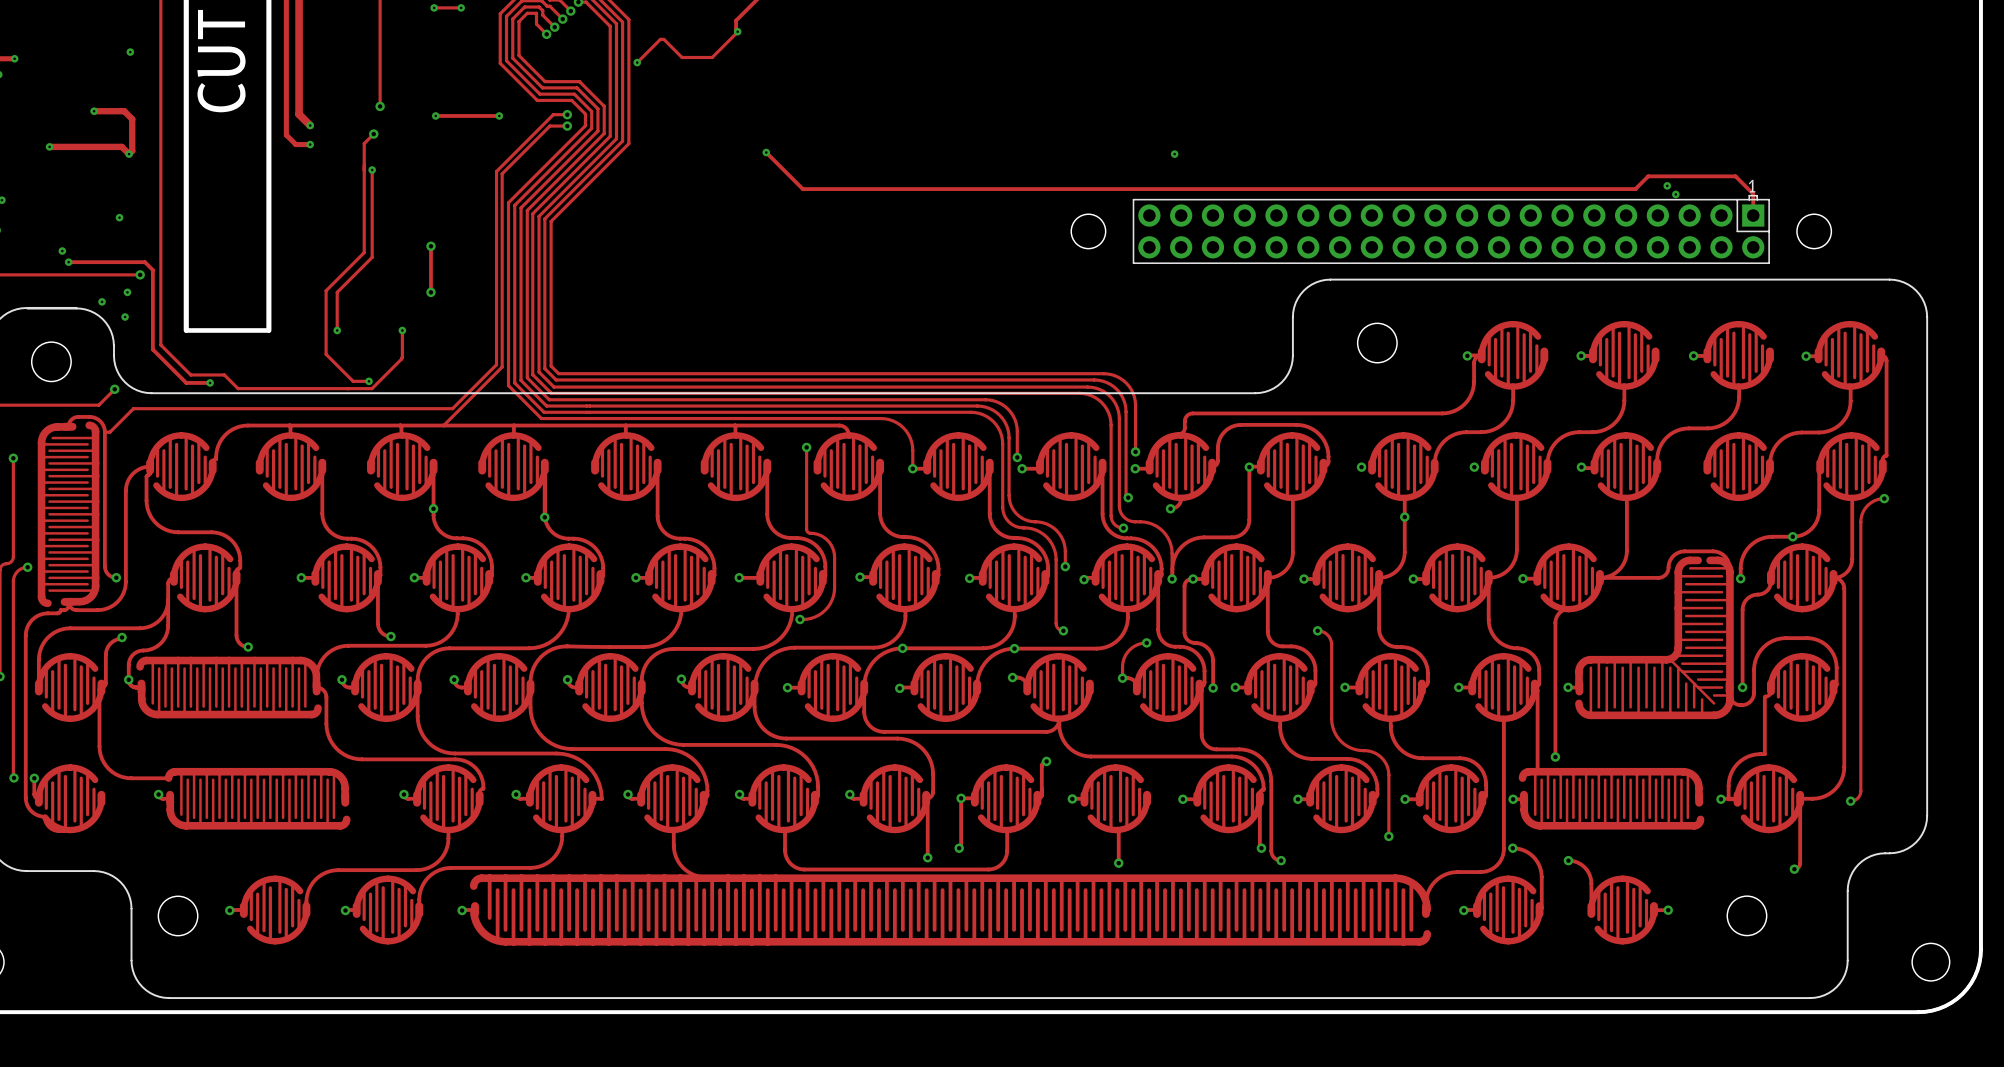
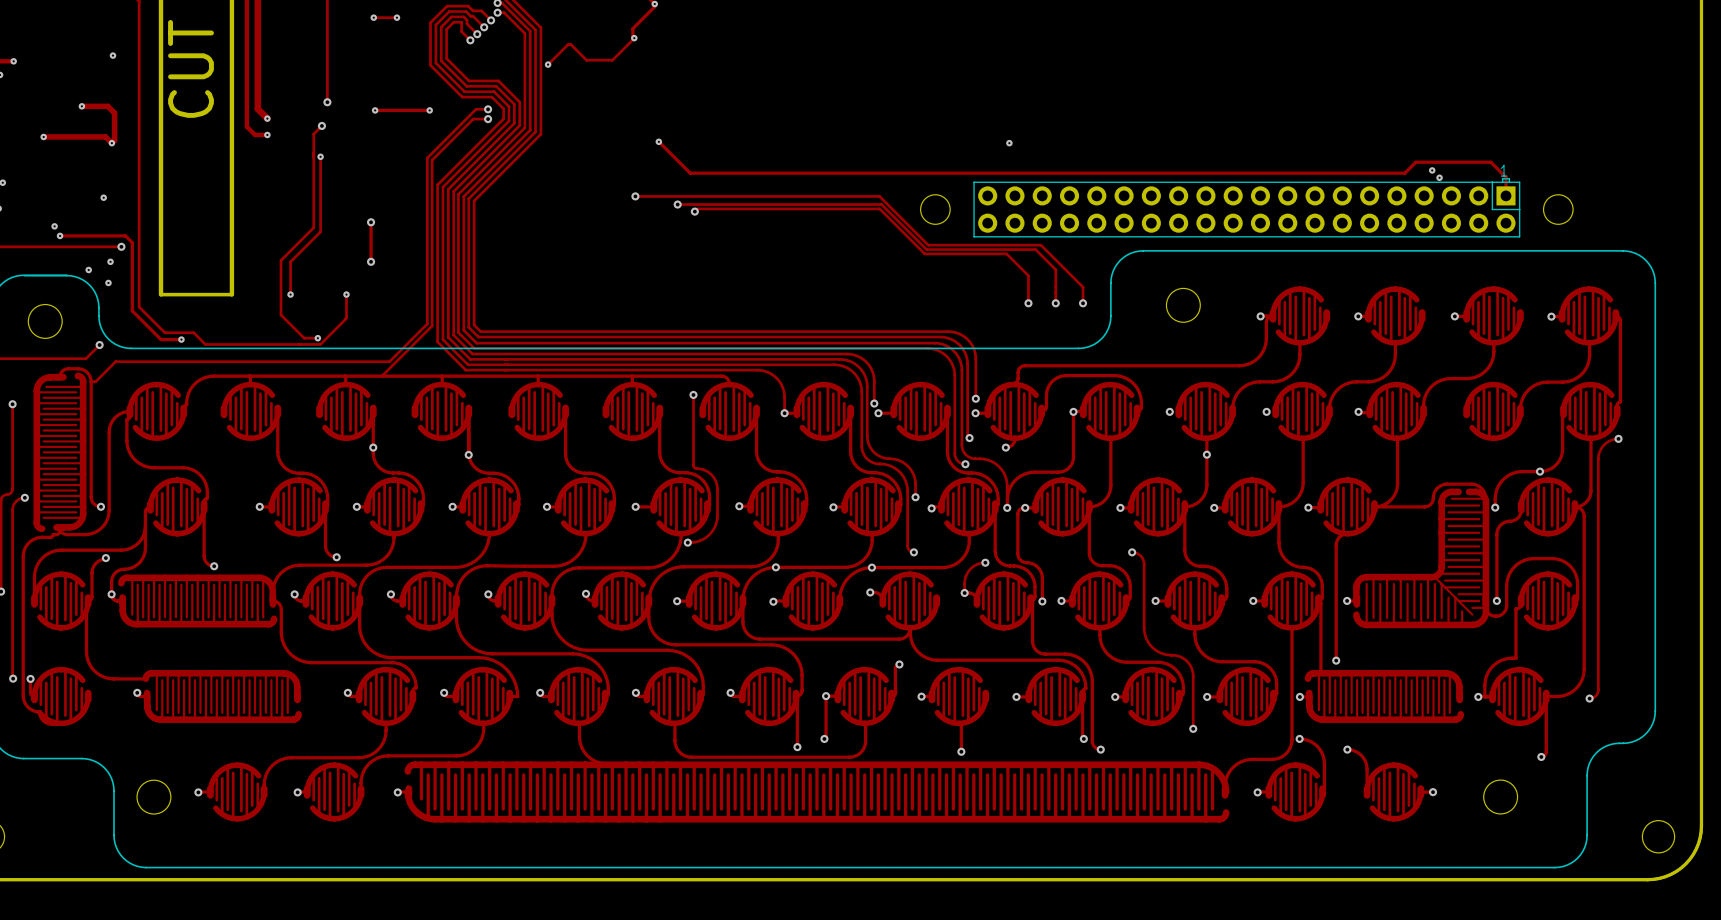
track: none -> (635, 196) (879, 196) (928, 245) (1041, 245) (1083, 287) (1083, 303)
via: none -> (635, 196)
track: none -> (677, 204) (881, 204) (926, 249) (1035, 249) (1055, 269) (1055, 303)
via: none -> (677, 204)
track: none -> (694, 211) (697, 208) (879, 208) (924, 253) (1006, 253) (1028, 275) (1028, 303)
via: none -> (694, 211)
via: none -> (1028, 303)
via: none -> (1055, 303)
via: none -> (1083, 303)

